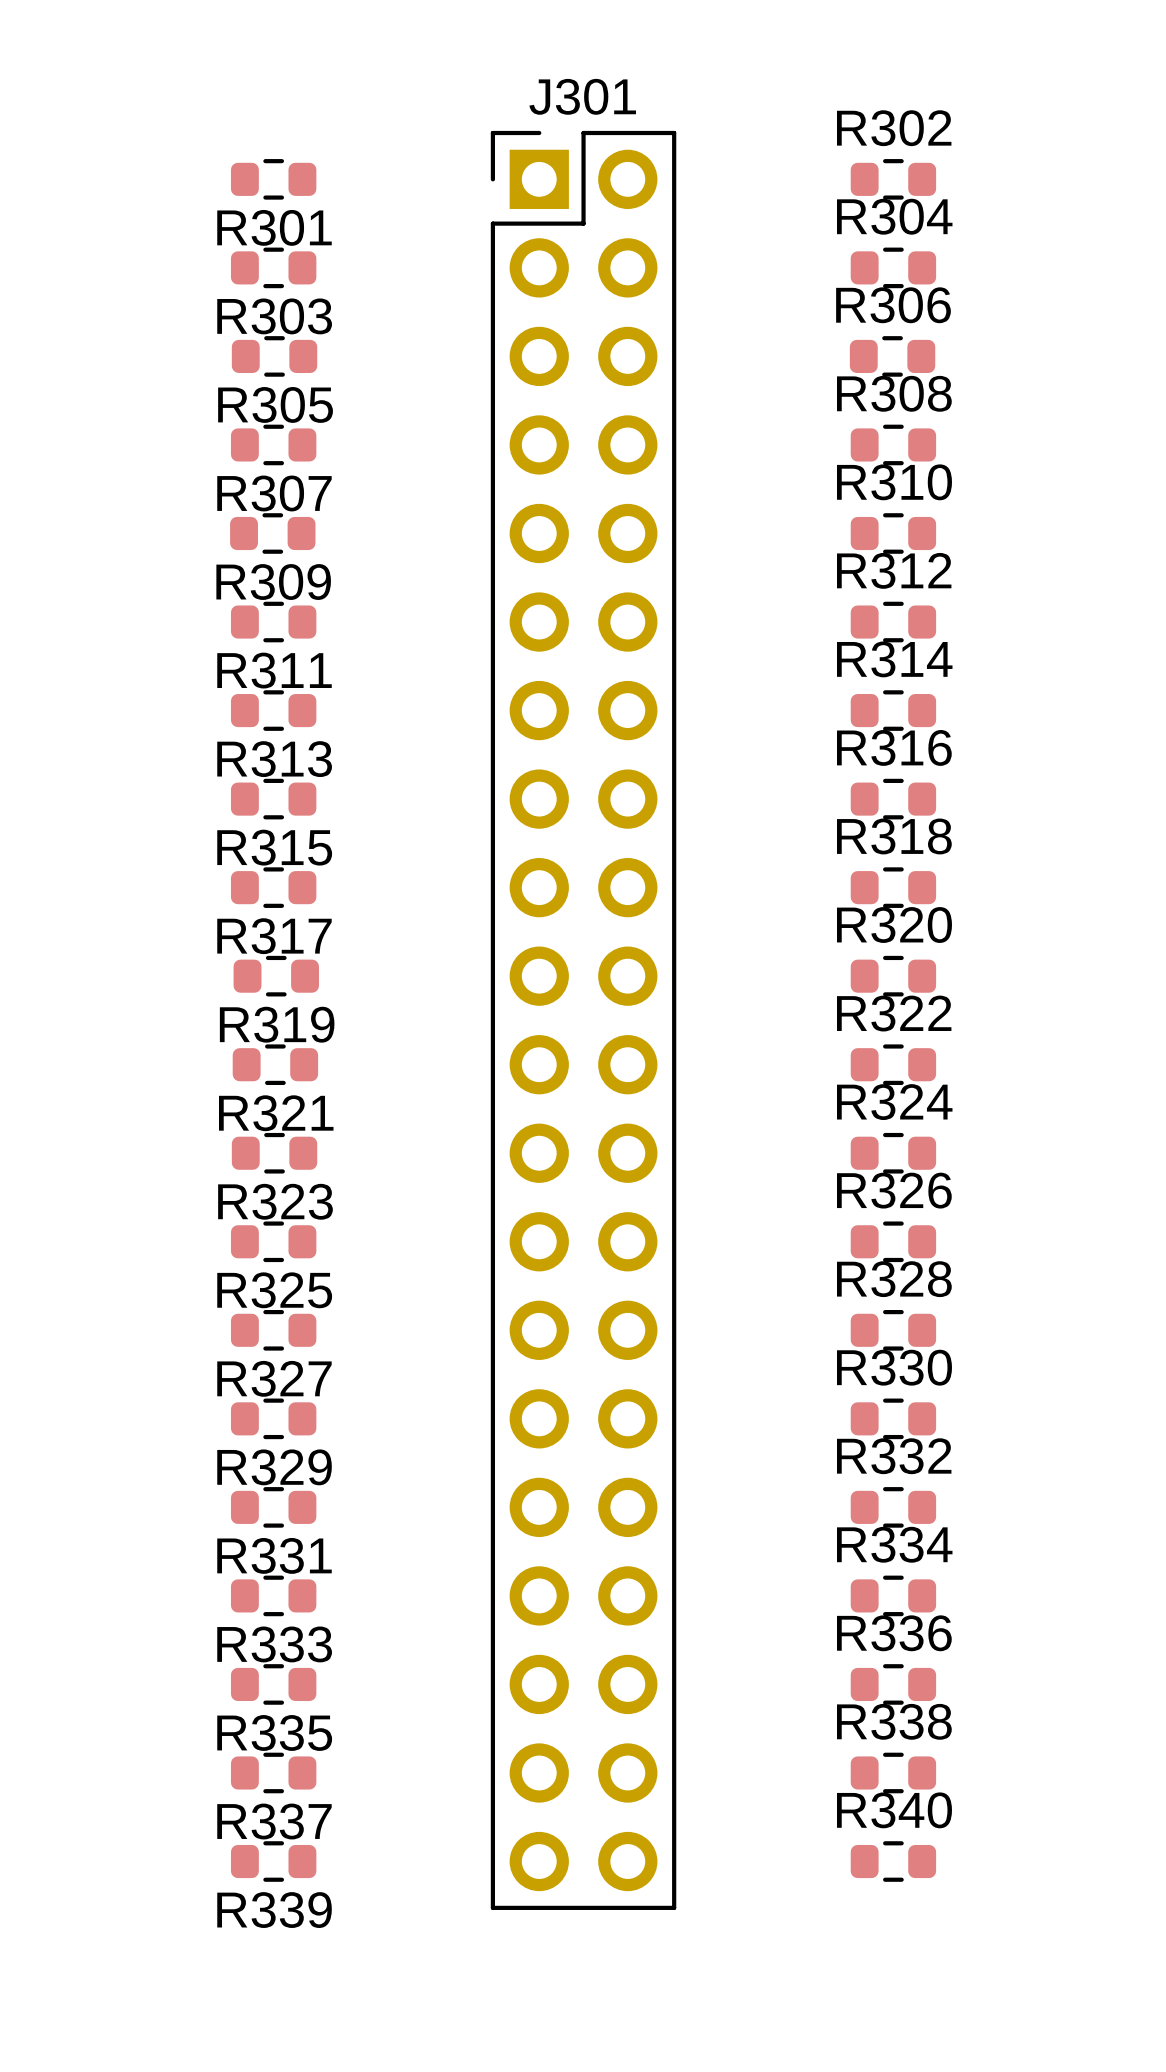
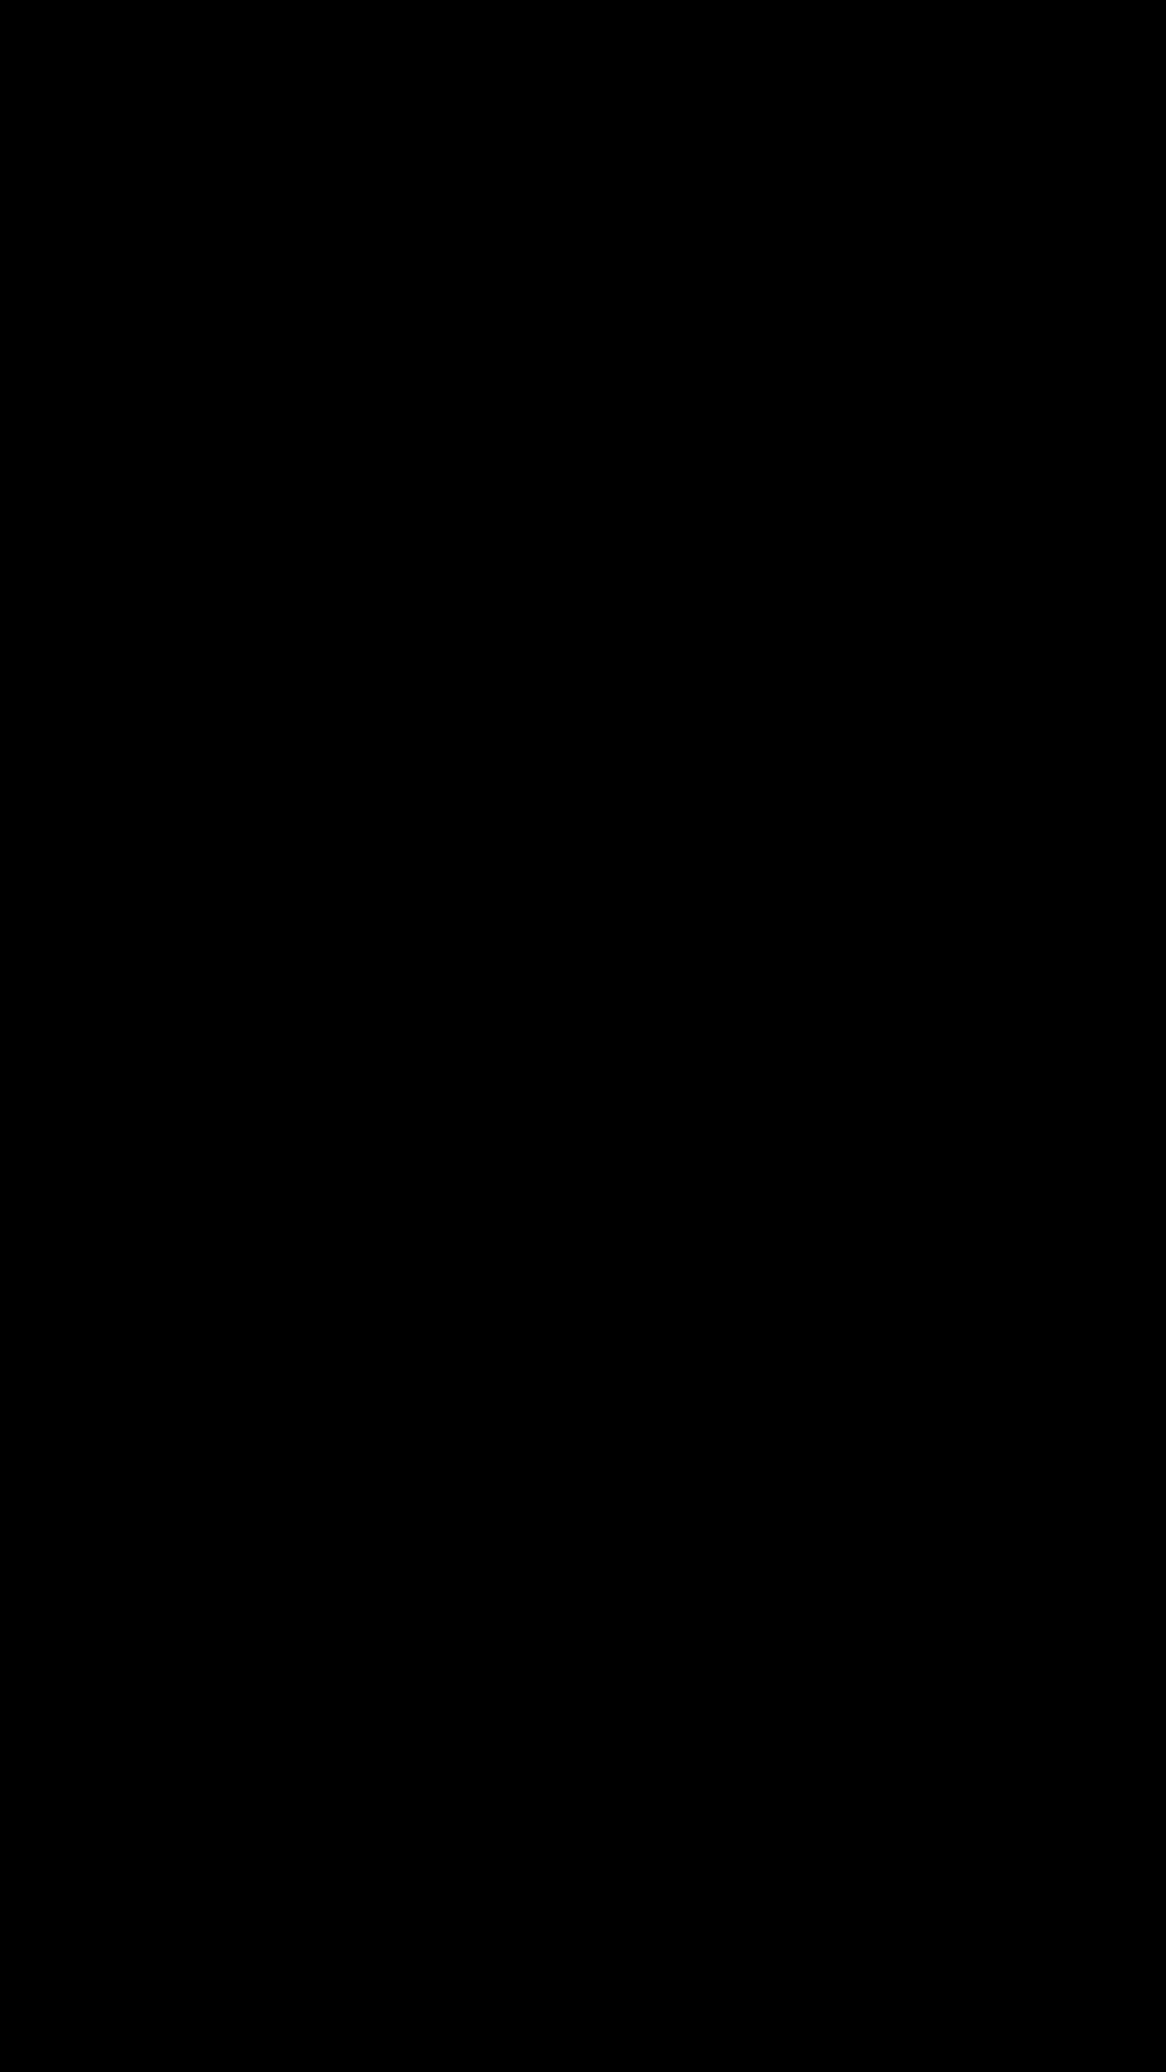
R301: (273, 179) -> none
R302: (893, 179) -> none
R303: (273, 267) -> none
R304: (893, 267) -> none
R305: (274, 356) -> none
R306: (892, 356) -> none
R307: (273, 444) -> none
R308: (893, 444) -> none
R309: (272, 533) -> none
R310: (893, 533) -> none
R311: (273, 622) -> none
R312: (893, 622) -> none
R313: (273, 710) -> none
R314: (893, 710) -> none
R315: (273, 799) -> none
R316: (893, 799) -> none
R317: (273, 887) -> none
R318: (893, 887) -> none
R319: (276, 976) -> none
R320: (893, 976) -> none
J301: (583, 1020) -> none
R321: (275, 1064) -> none
R322: (893, 1064) -> none
R323: (274, 1153) -> none
R324: (893, 1153) -> none
R325: (273, 1241) -> none
R326: (893, 1241) -> none
R327: (273, 1330) -> none
R328: (893, 1330) -> none
R329: (273, 1418) -> none
R330: (893, 1418) -> none
R331: (273, 1507) -> none
R332: (893, 1507) -> none
R333: (273, 1595) -> none
R334: (893, 1595) -> none
R335: (273, 1684) -> none
R336: (893, 1684) -> none
R337: (273, 1772) -> none
R338: (893, 1772) -> none
R339: (273, 1861) -> none
R340: (893, 1861) -> none

